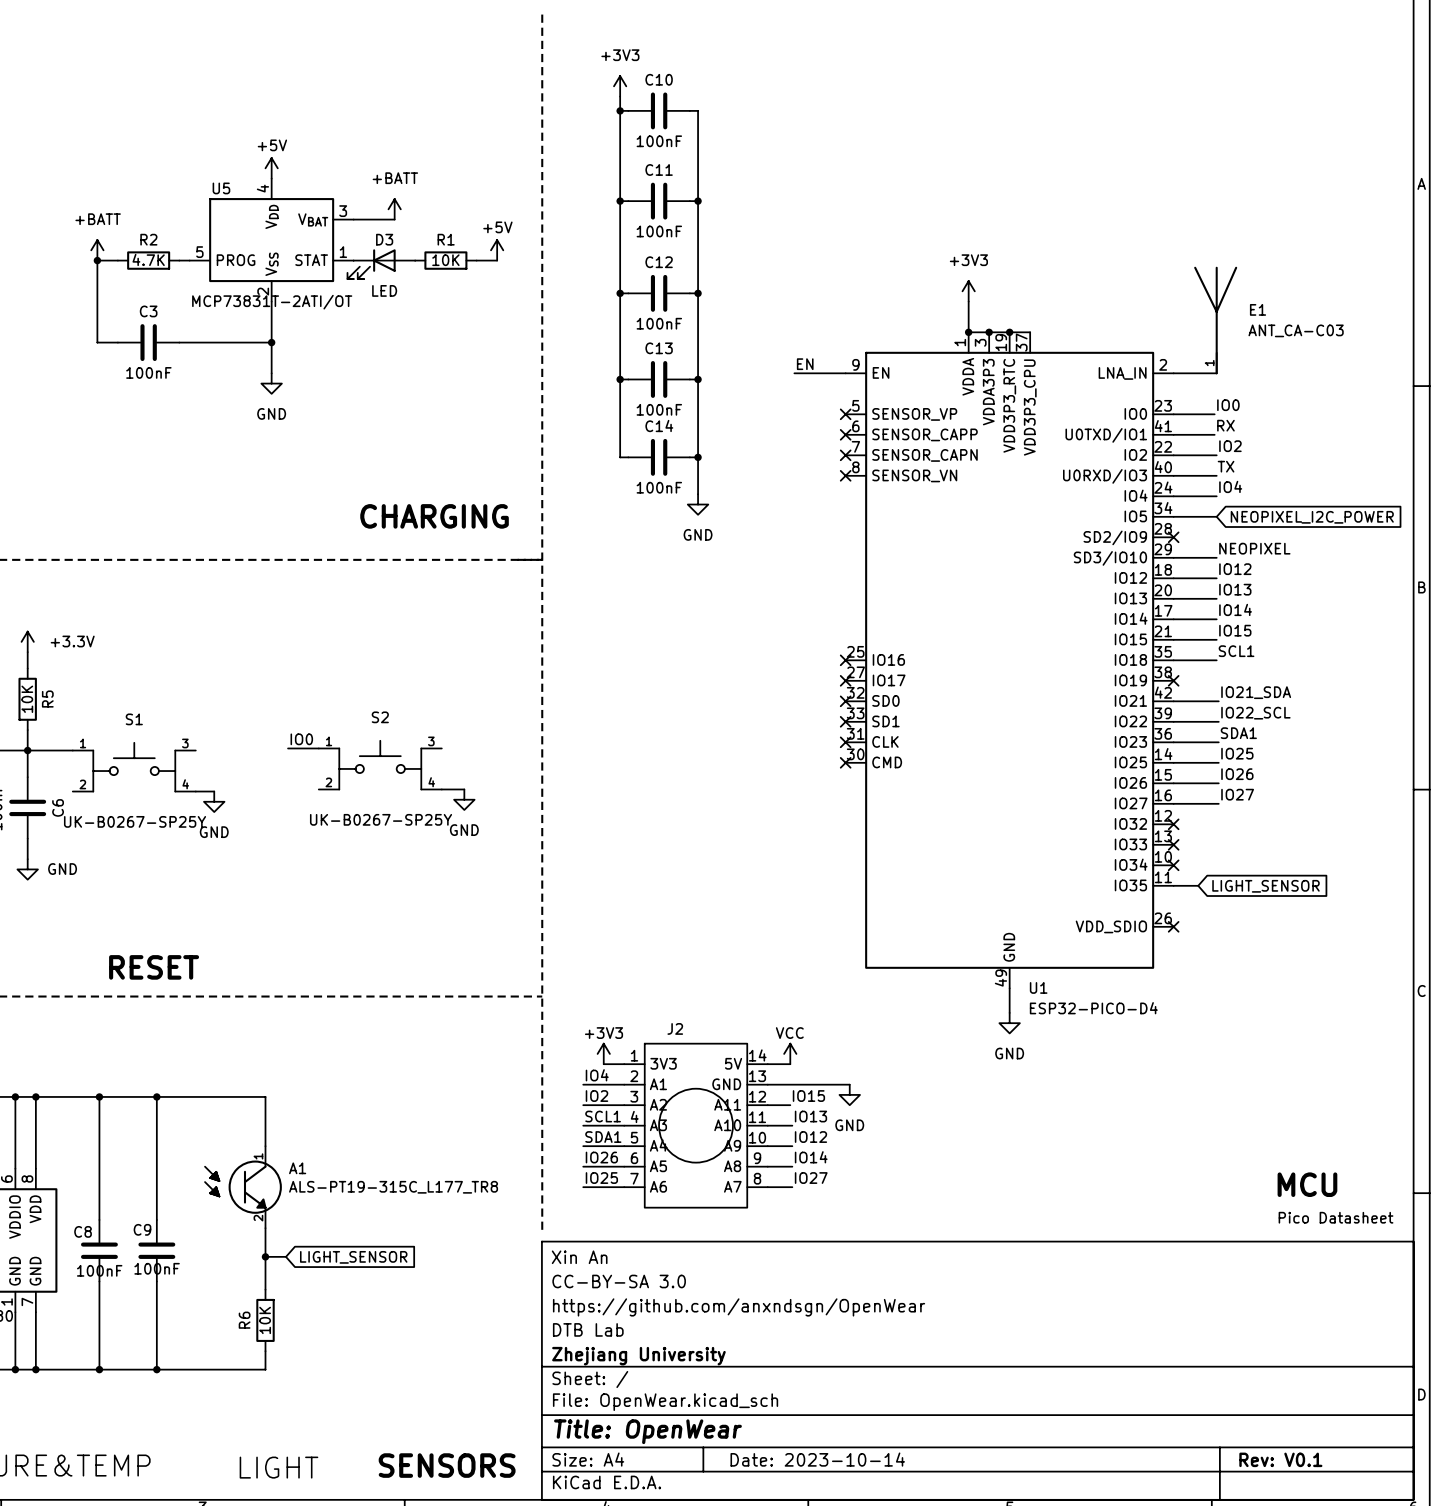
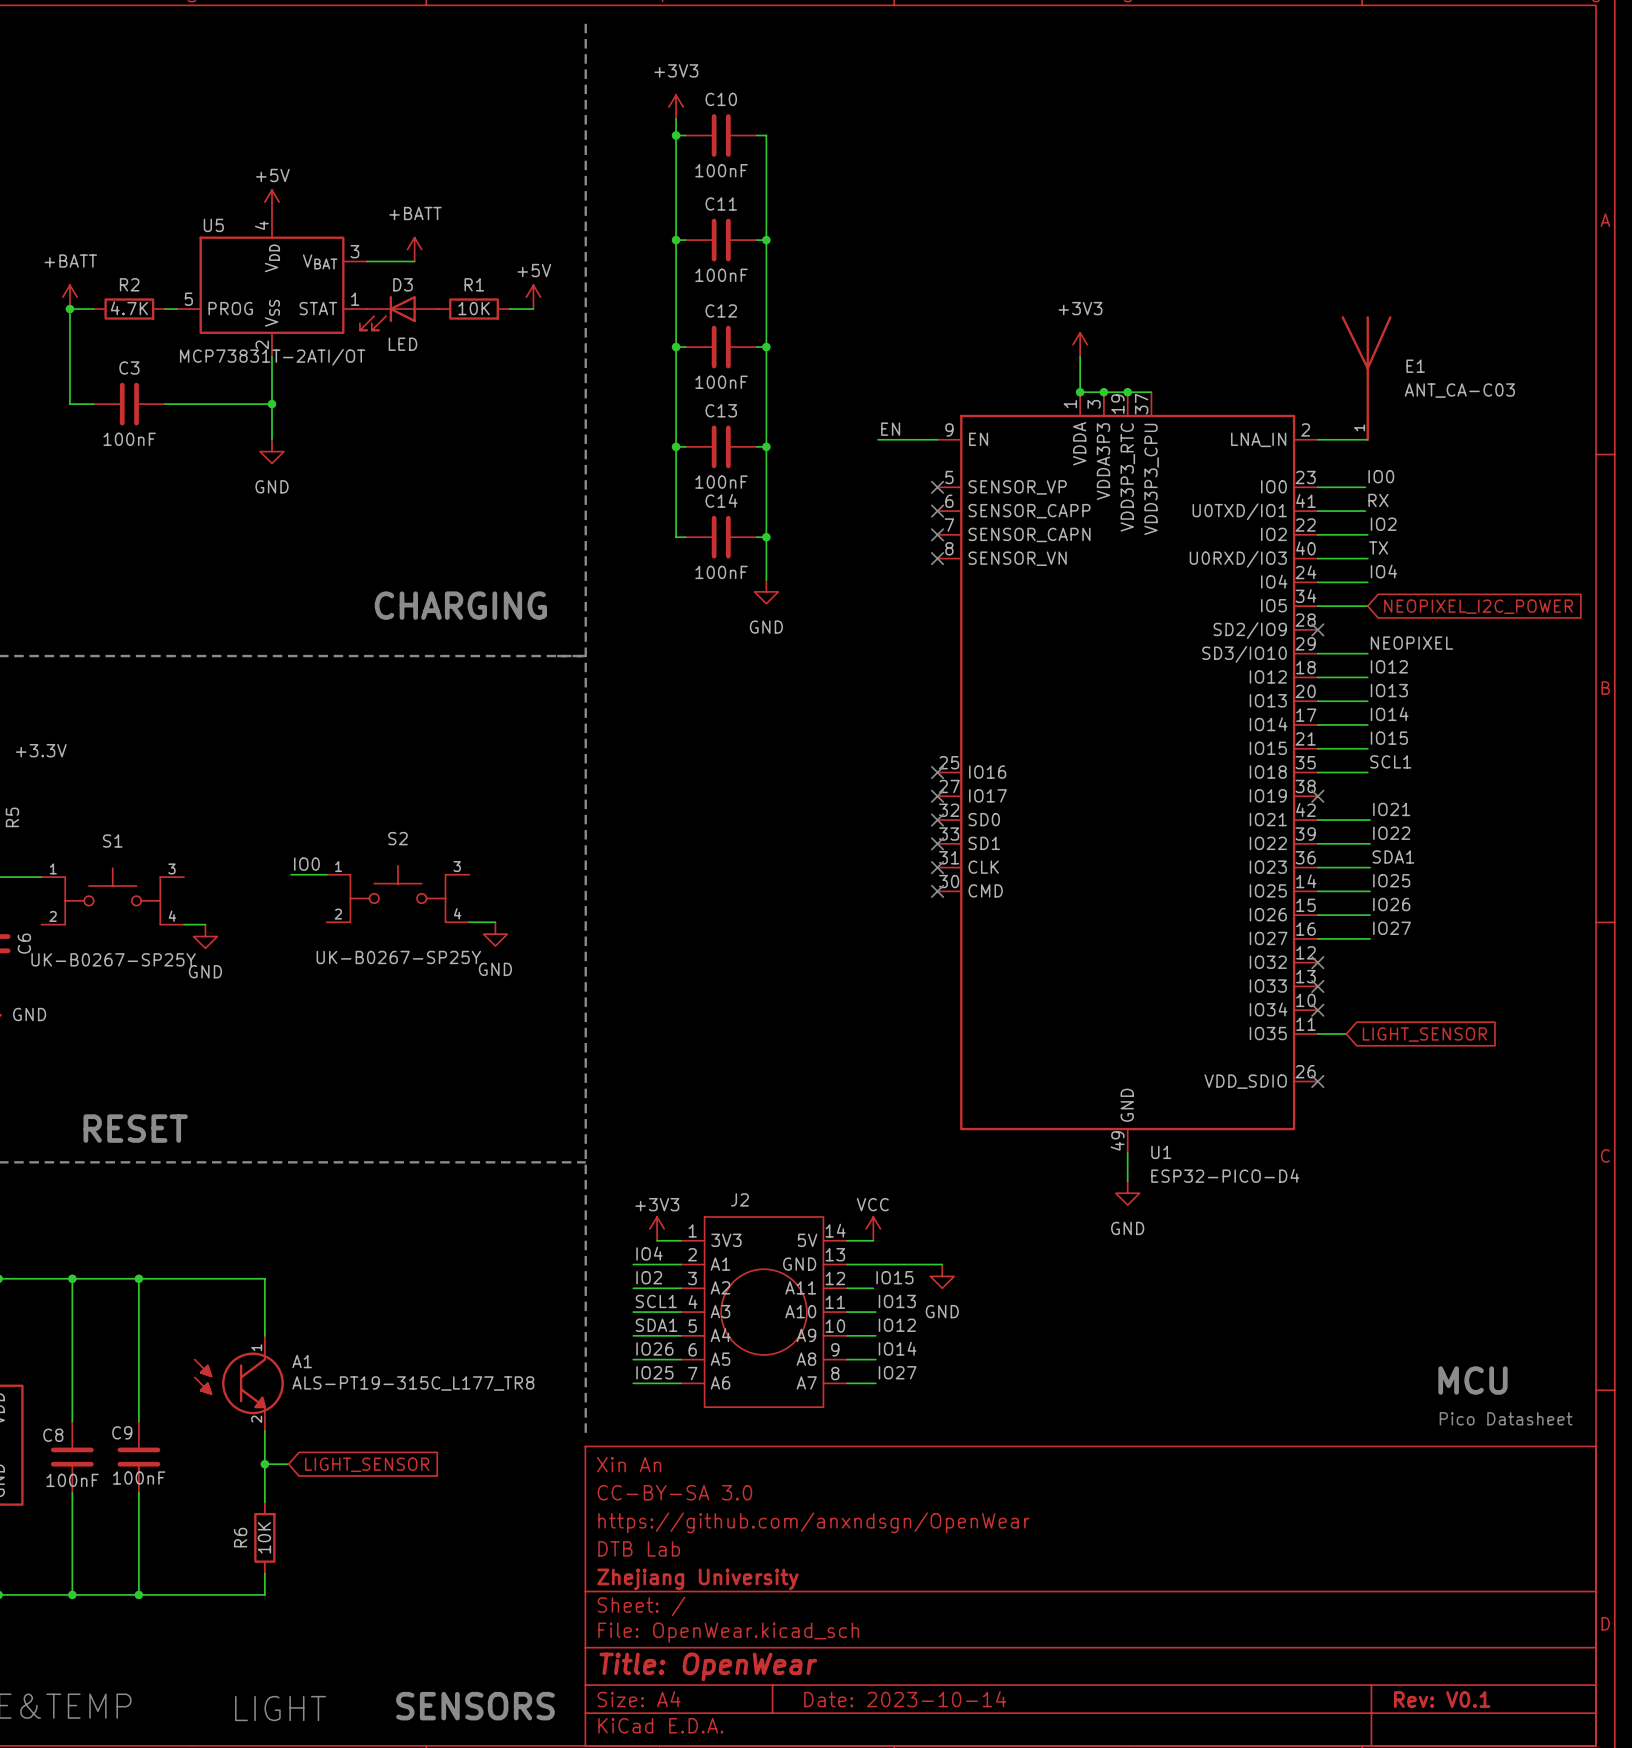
label: IO21_SDA (1256, 692) -> IO21 (1391, 809)
label: IO22_SCL (1255, 713) -> IO22 (1391, 833)

